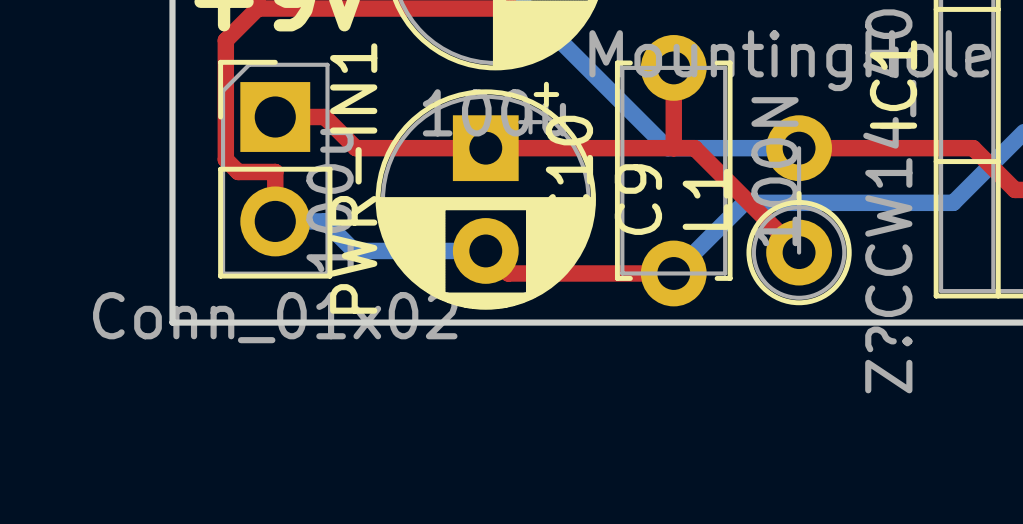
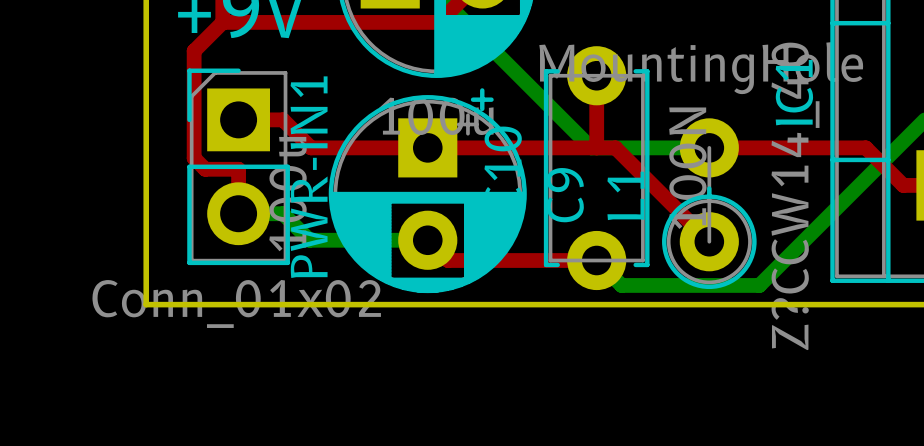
bottom track: (953, 202) (744, 202) (673, 273) -> (847, 197) (759, 285) (621, 285) (596, 260)

